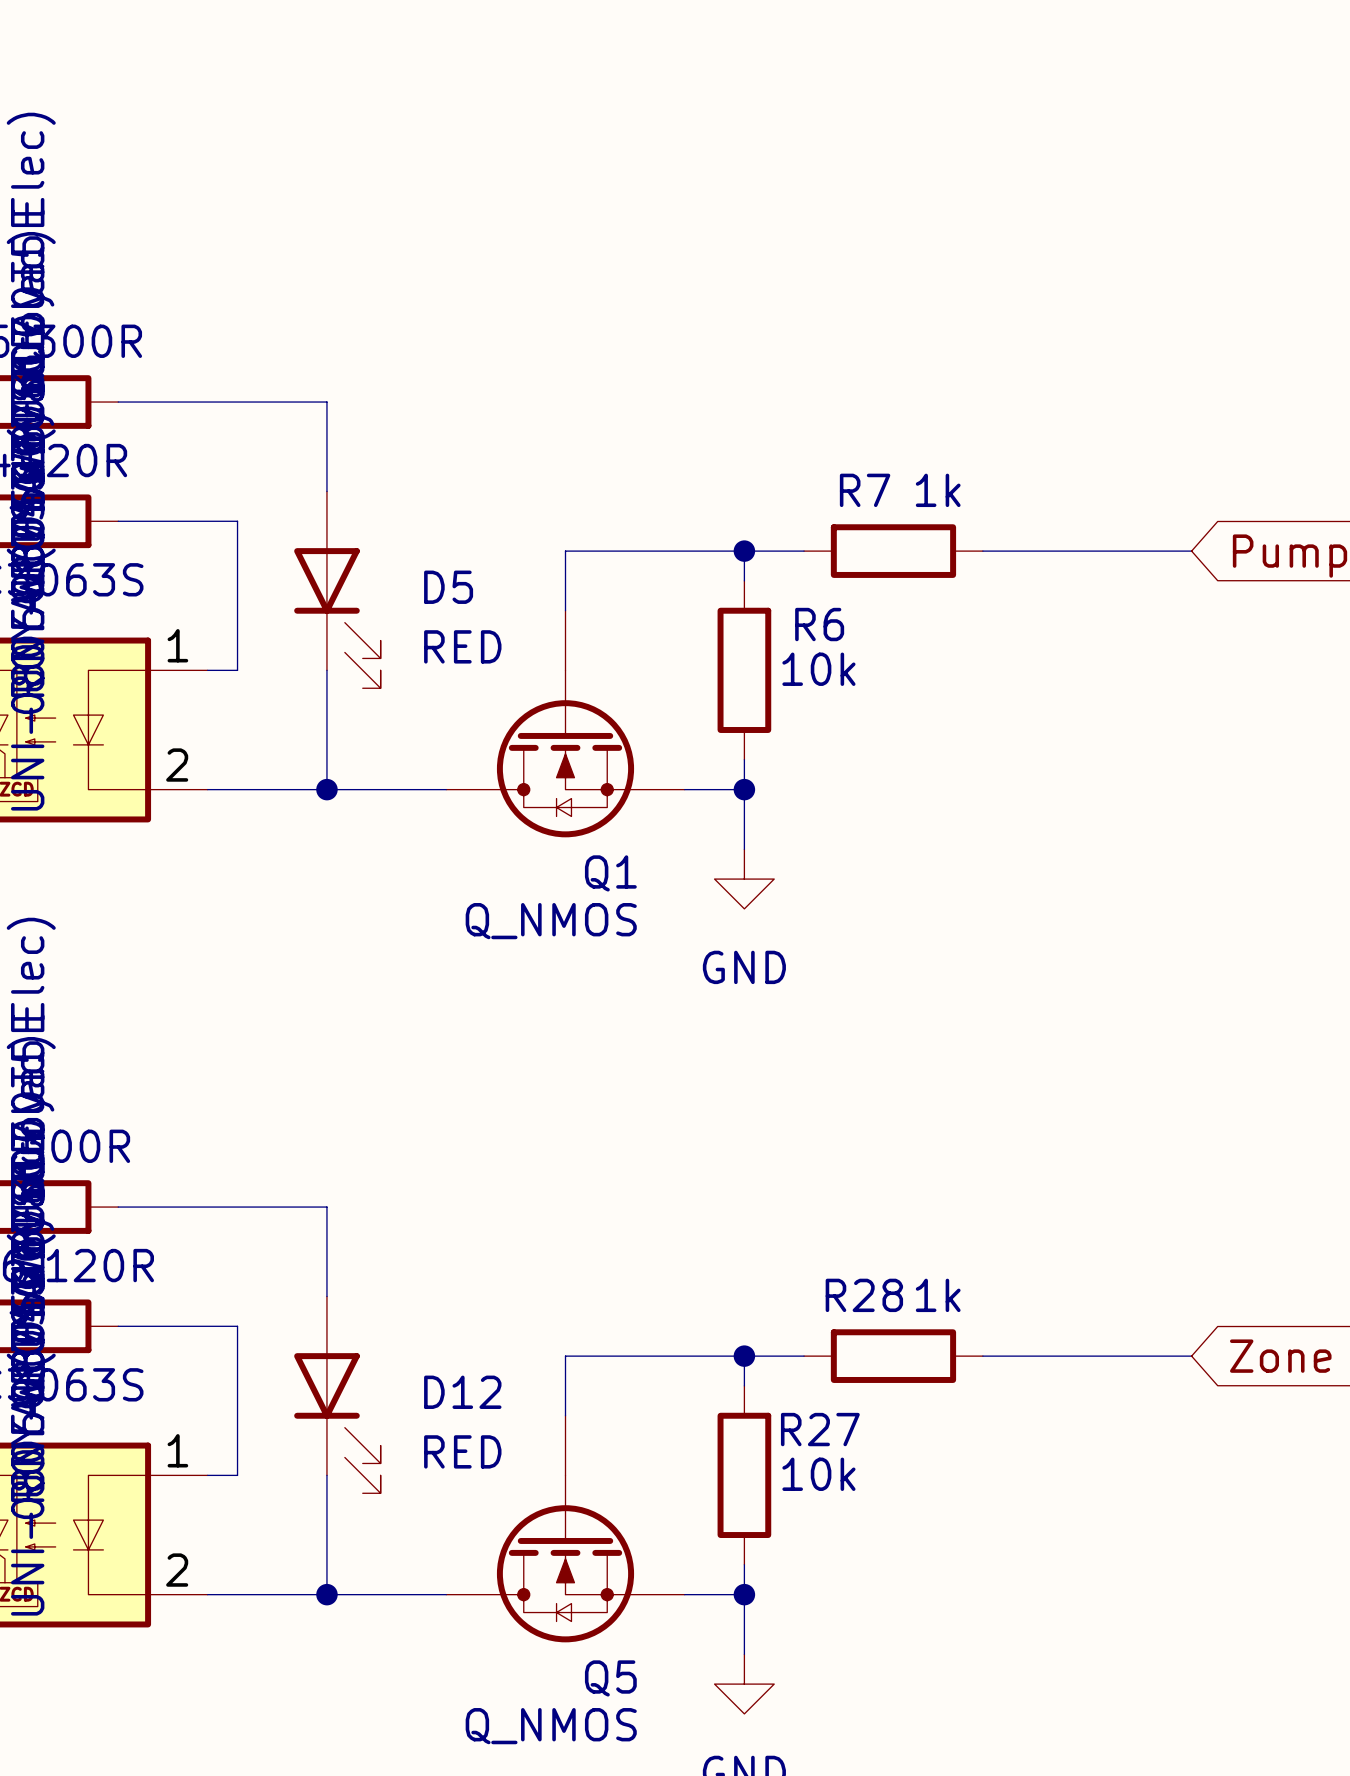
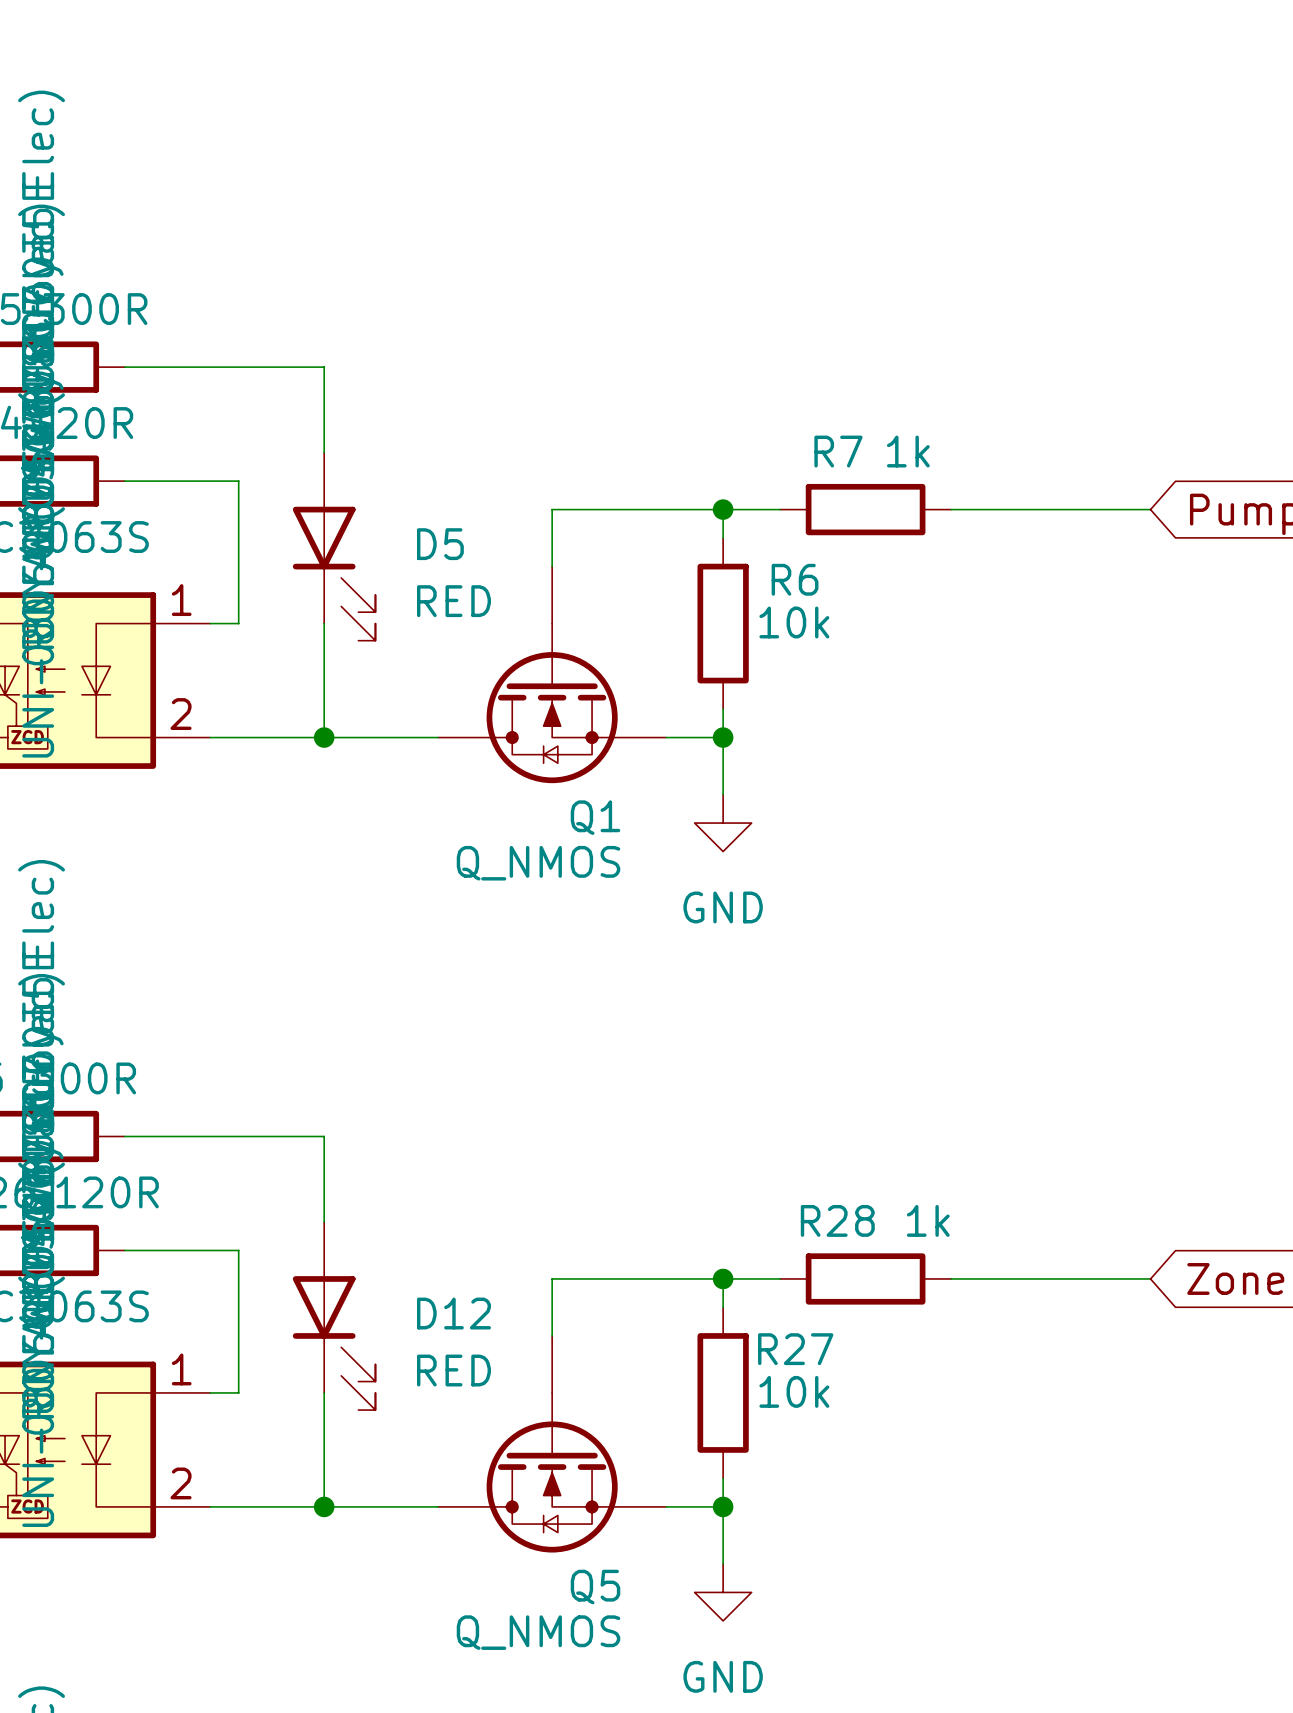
R28 value position: 1k (938, 1295) -> 1k (928, 1220)

